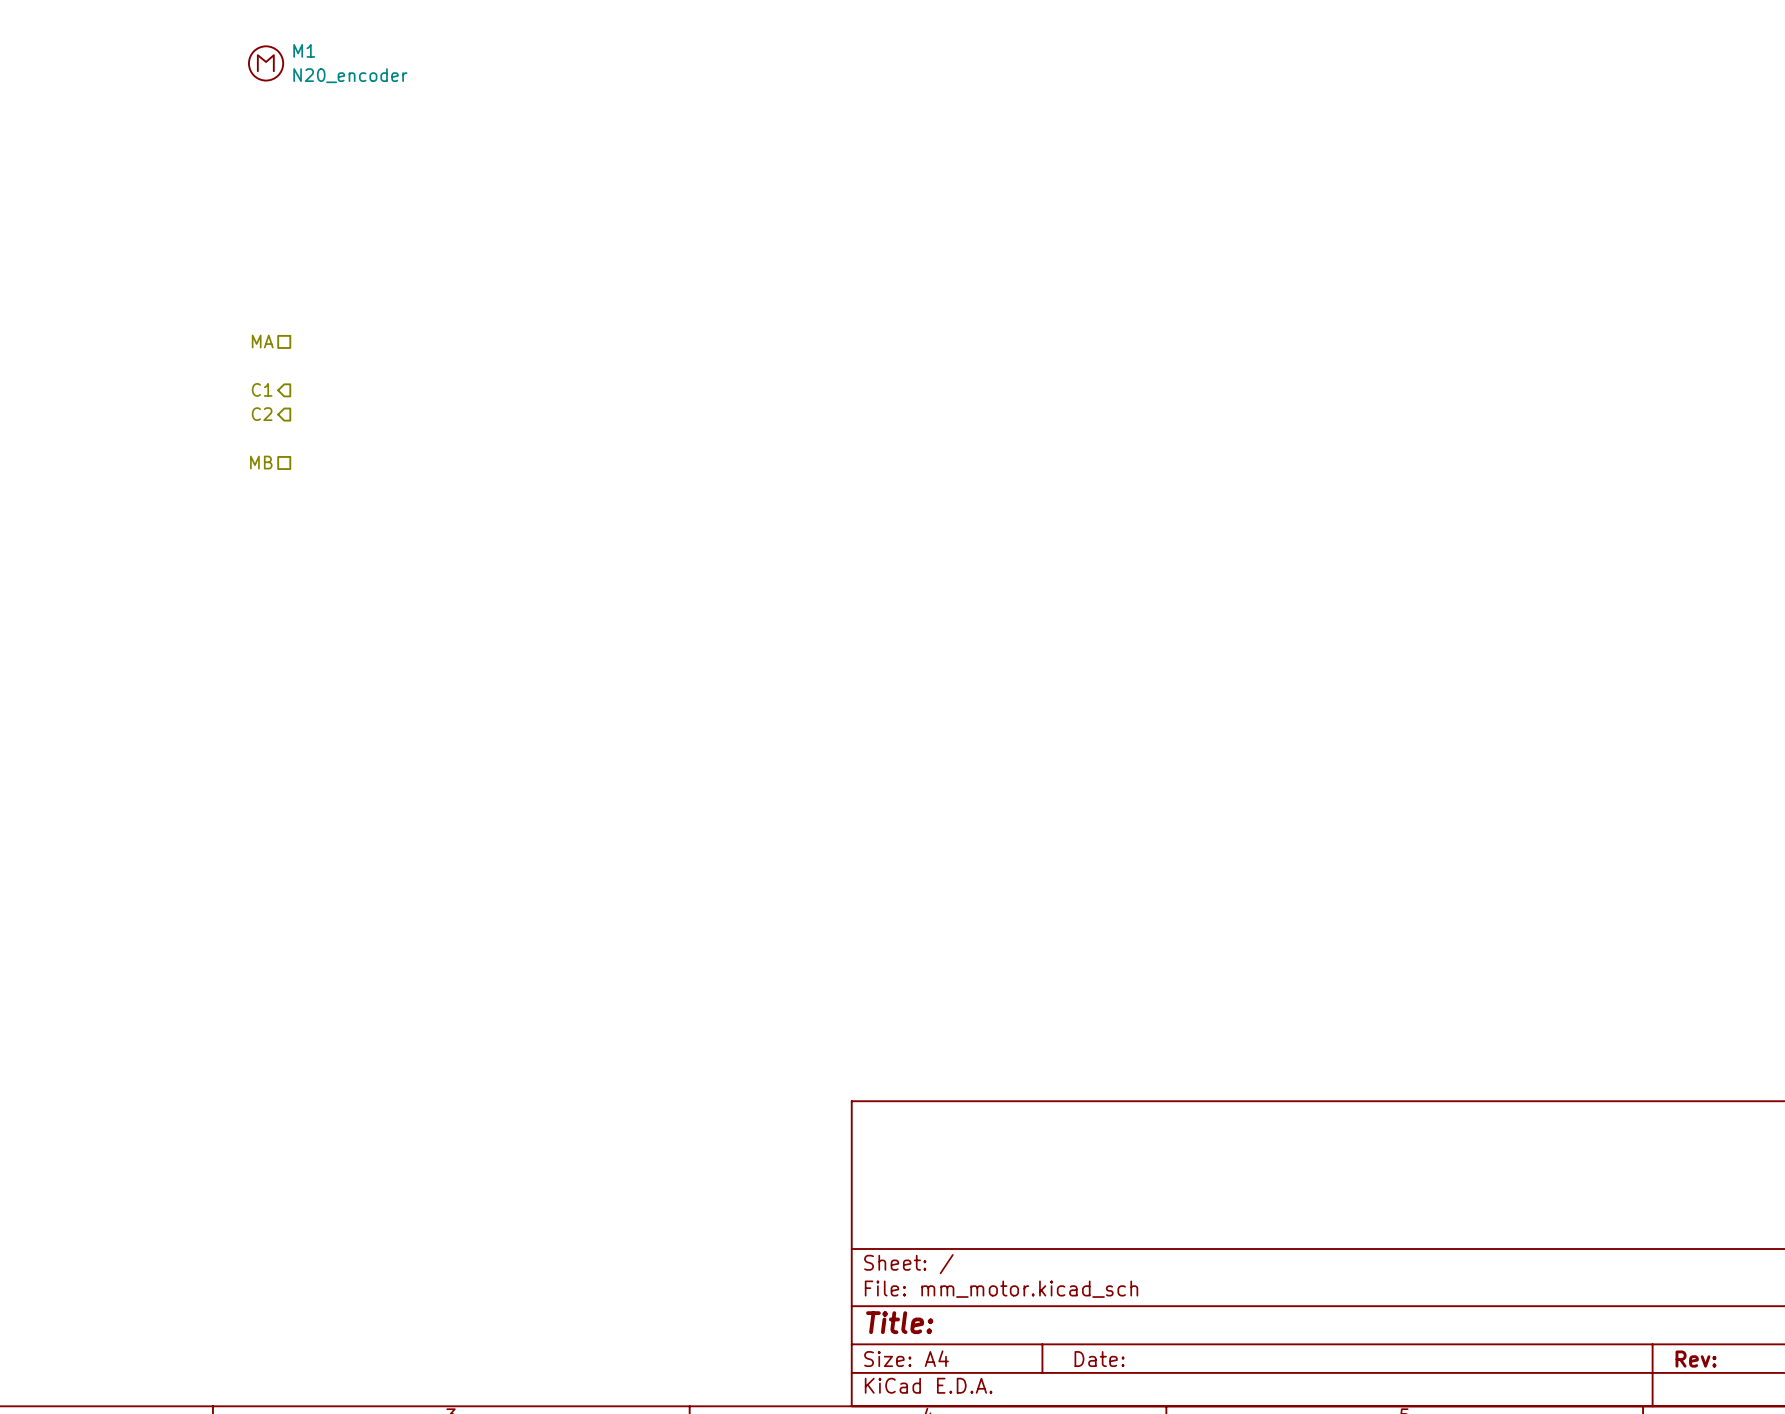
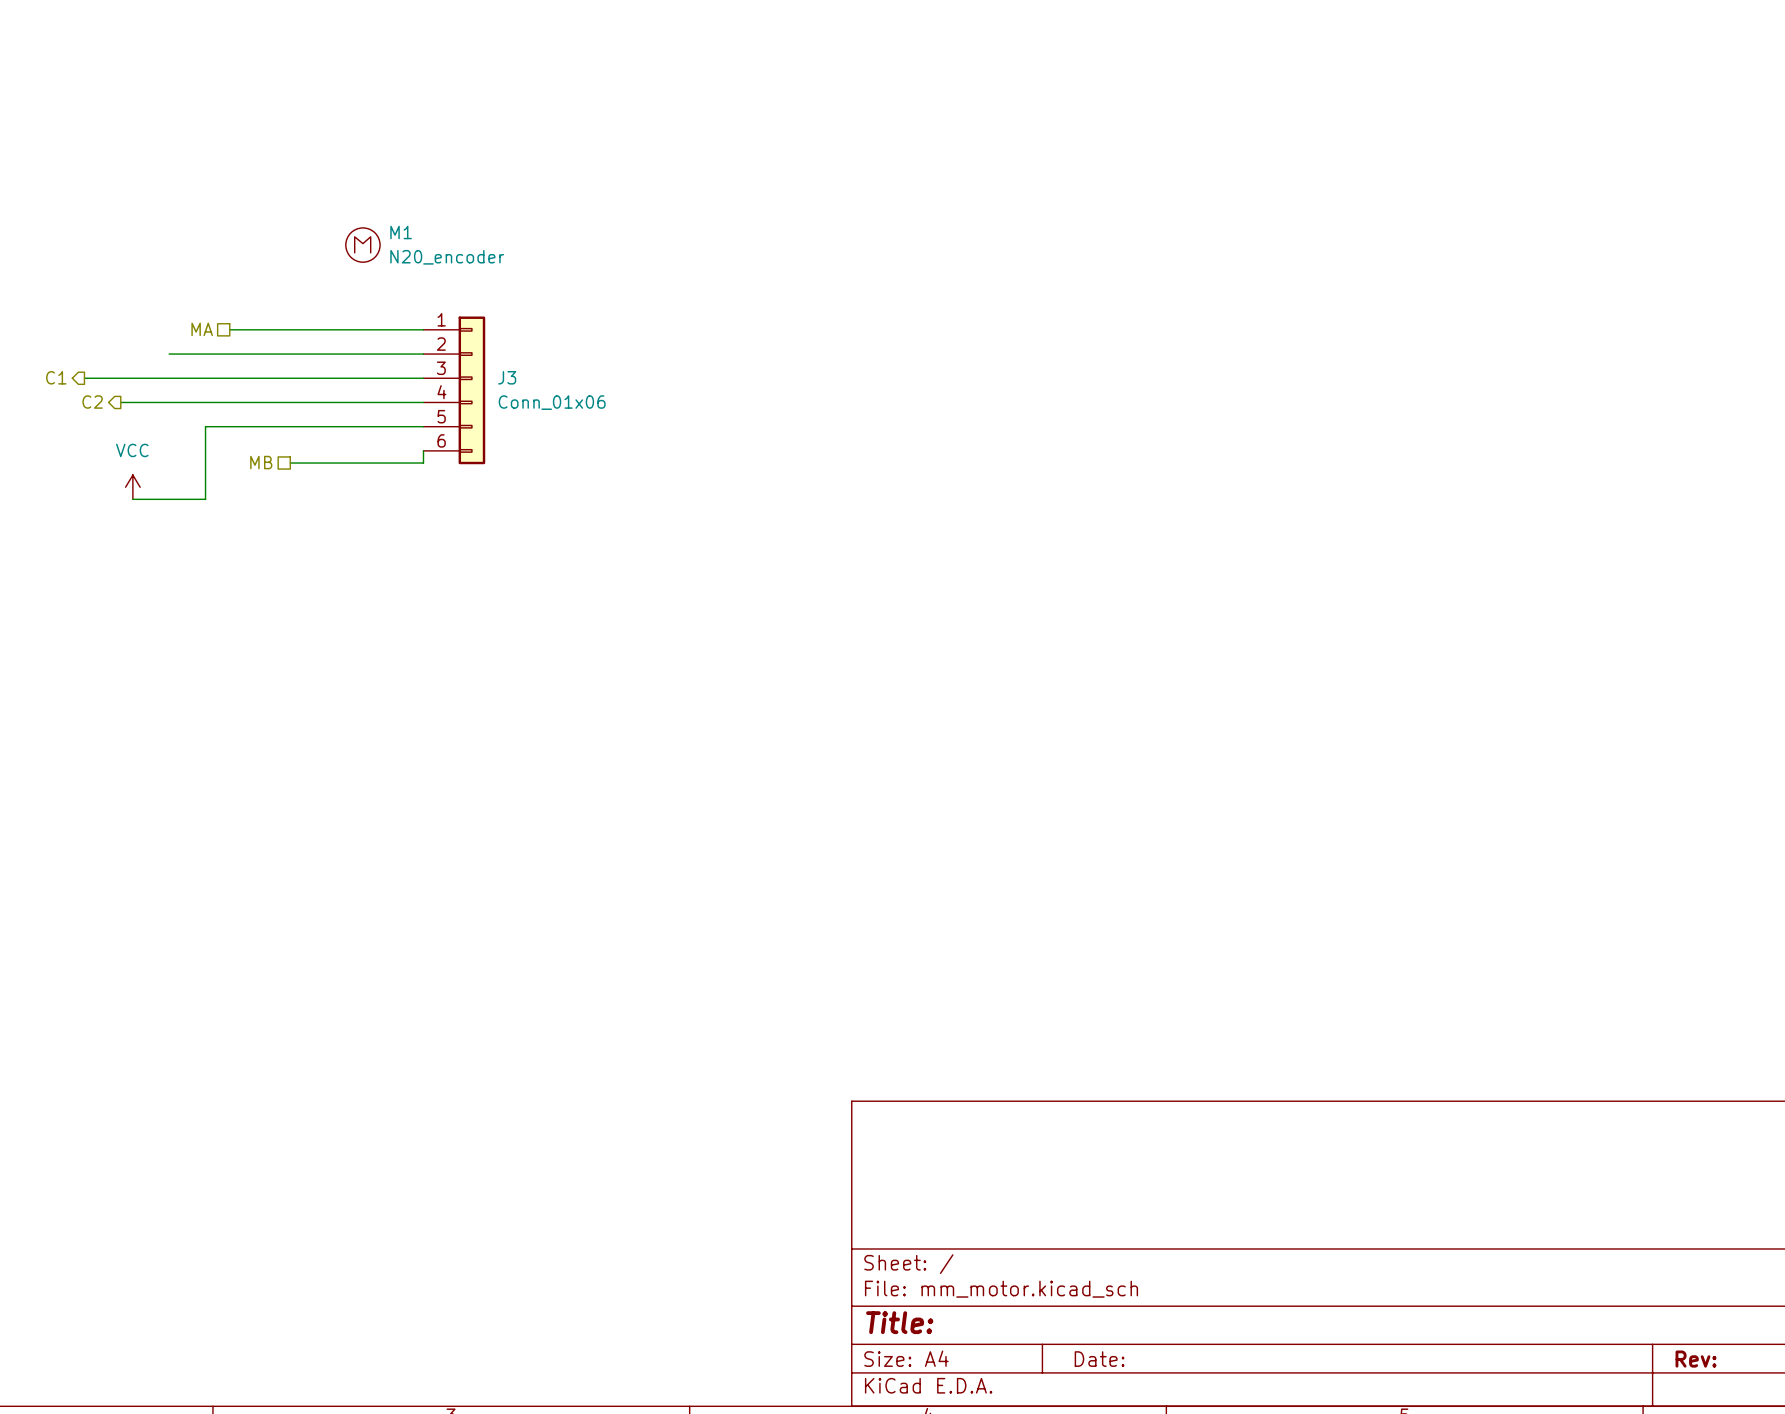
M1 position: (266, 63) -> (362, 245)
wire: none -> (229, 329) (423, 329)
hierarchical label position: MA (262, 341) -> MA (202, 329)
wire: none -> (169, 354) (423, 354)
wire: none -> (84, 378) (423, 378)
hierarchical label position: C1 (262, 389) -> C1 (56, 377)
J3: none -> Conn_01x06 (454, 390)
wire: none -> (120, 402) (423, 402)
hierarchical label position: C2 (262, 414) -> C2 (92, 402)
wire: none -> (423, 426) (205, 426) (205, 499) (132, 499)
wire: none -> (423, 450) (423, 463) (290, 463)
power symbol: none -> VCC (132, 487)

